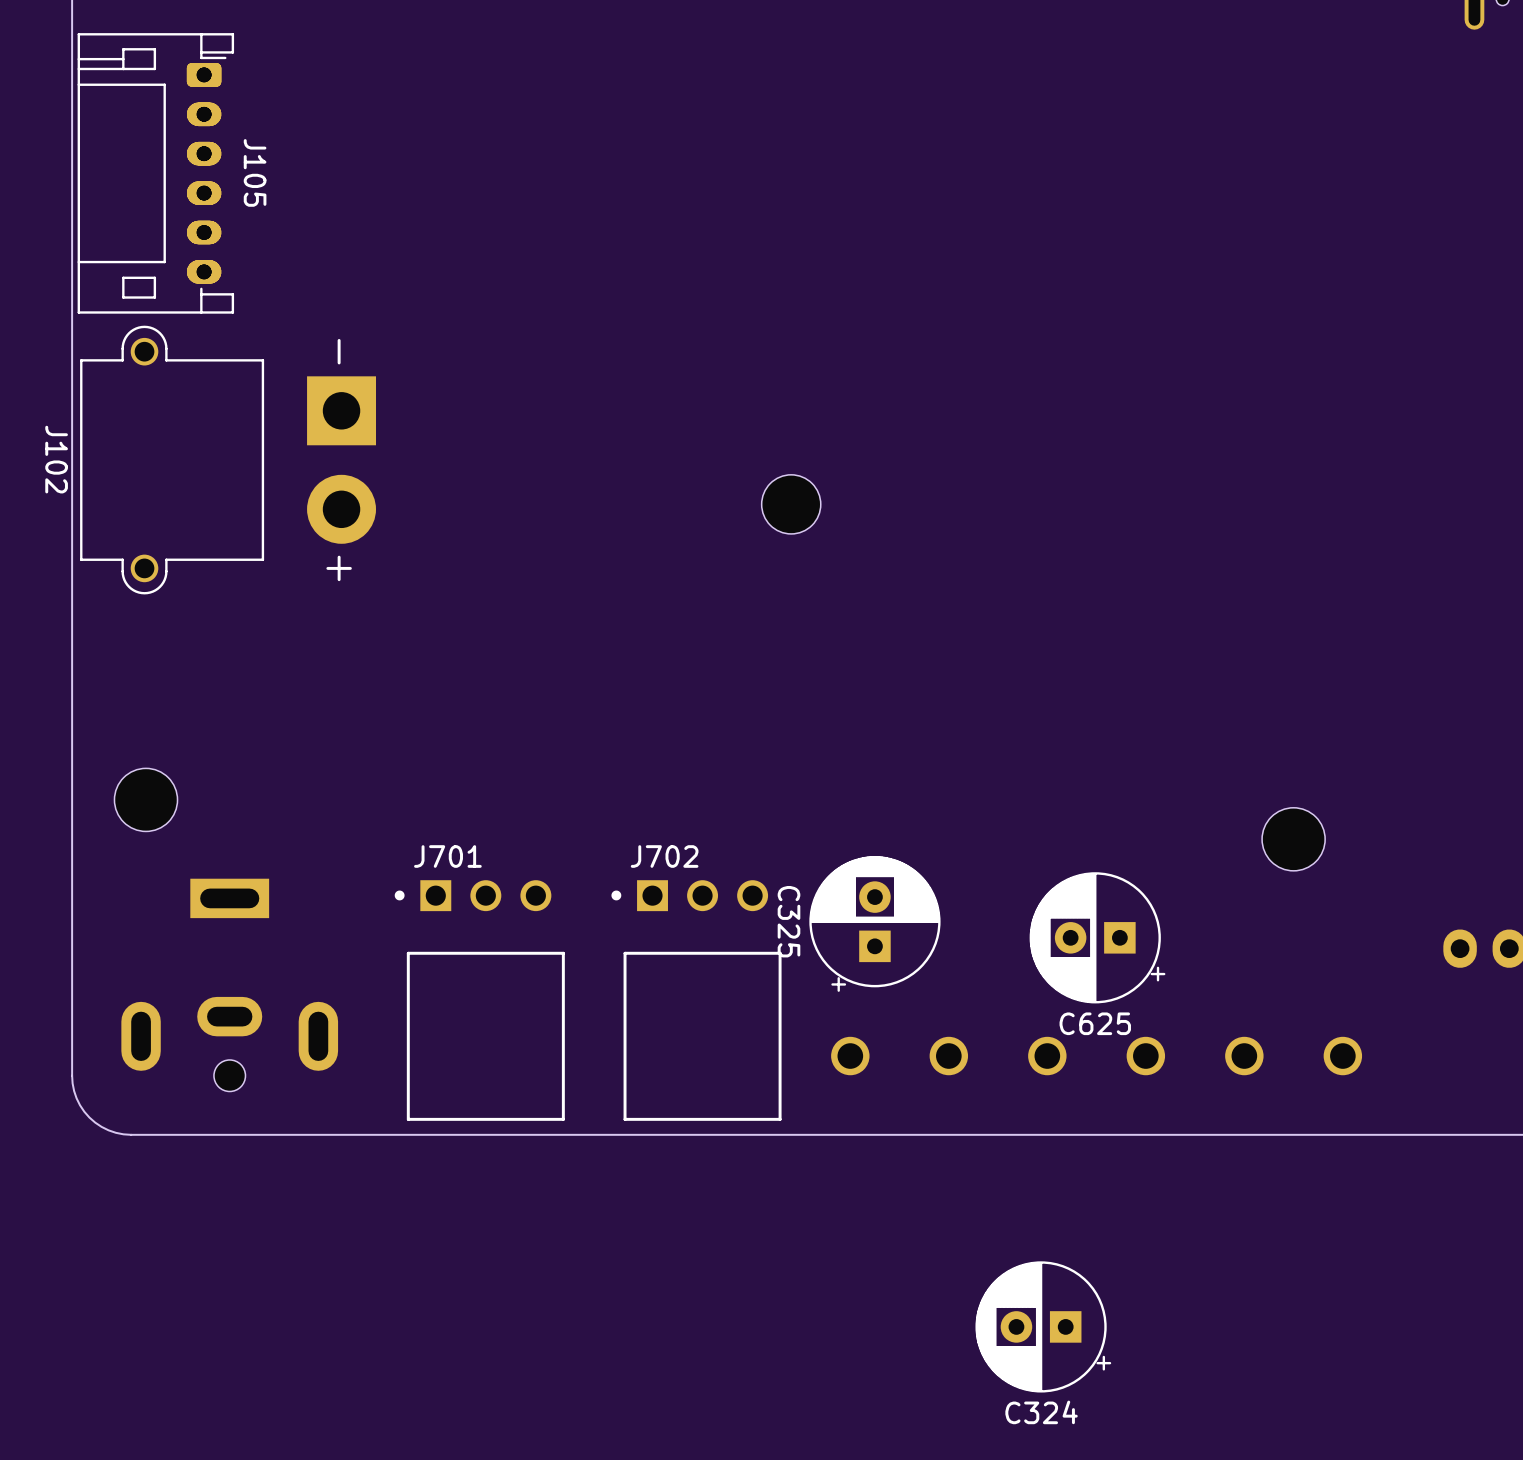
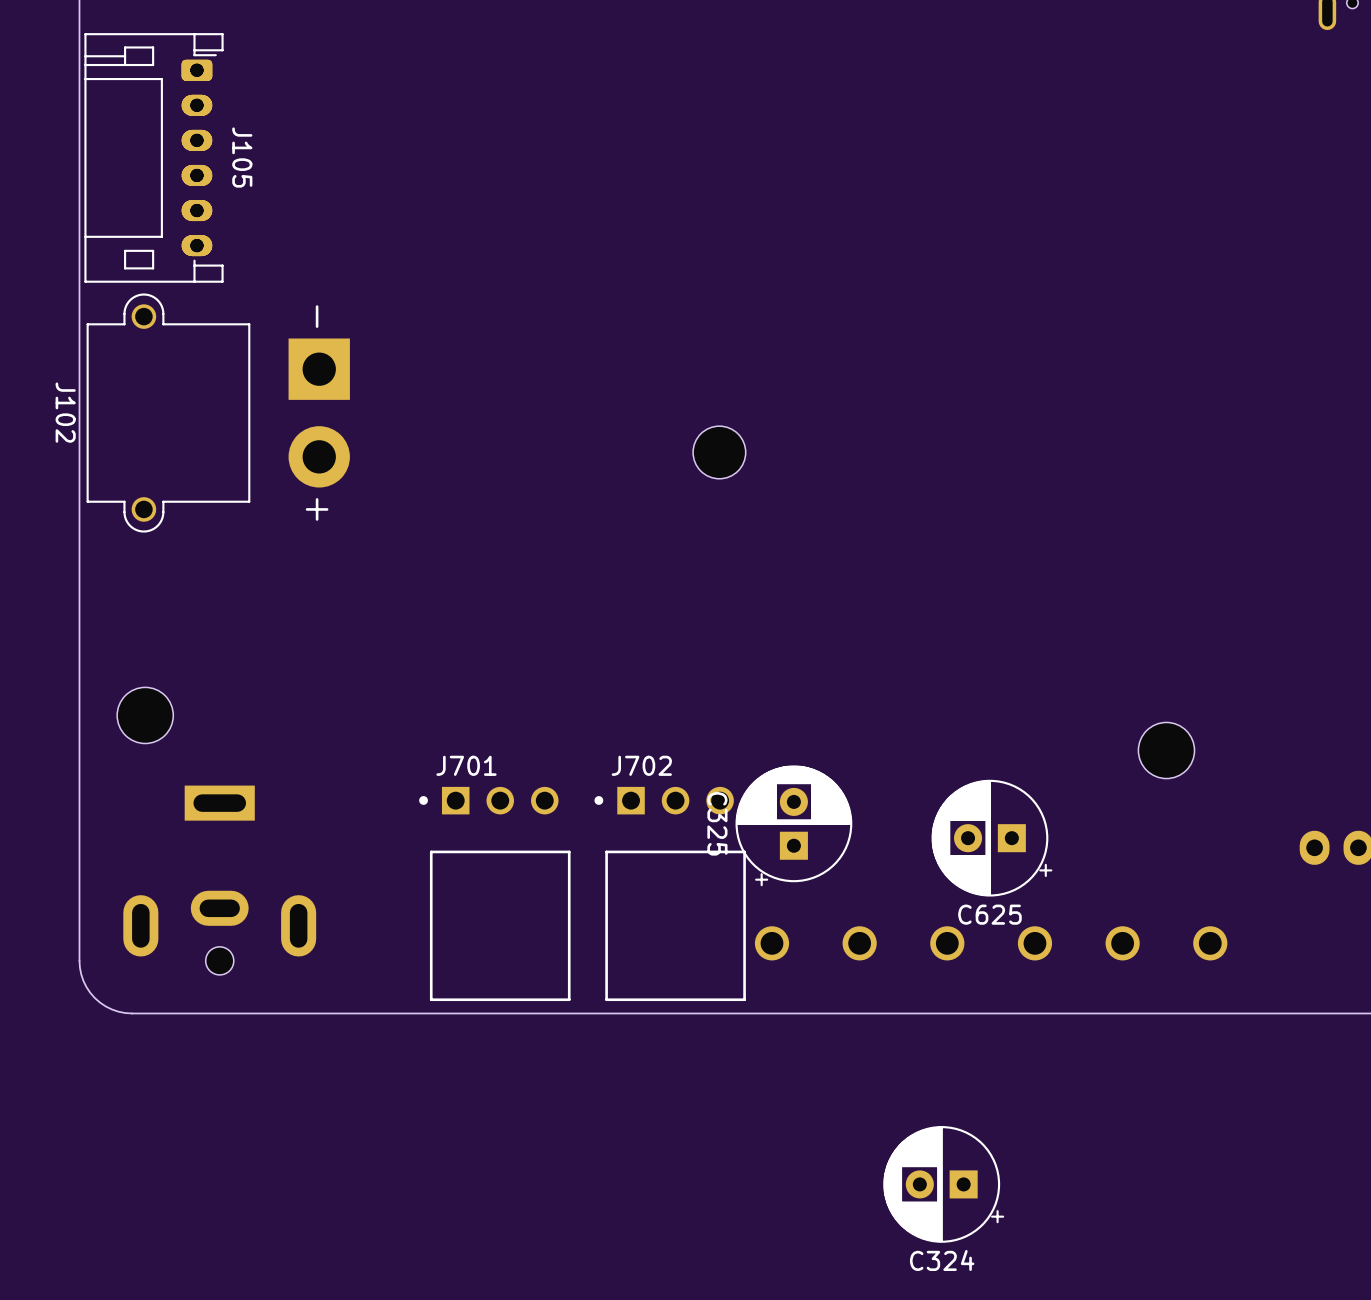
J701 position: (479, 1000) -> (494, 893)
J702 position: (696, 1000) -> (670, 893)

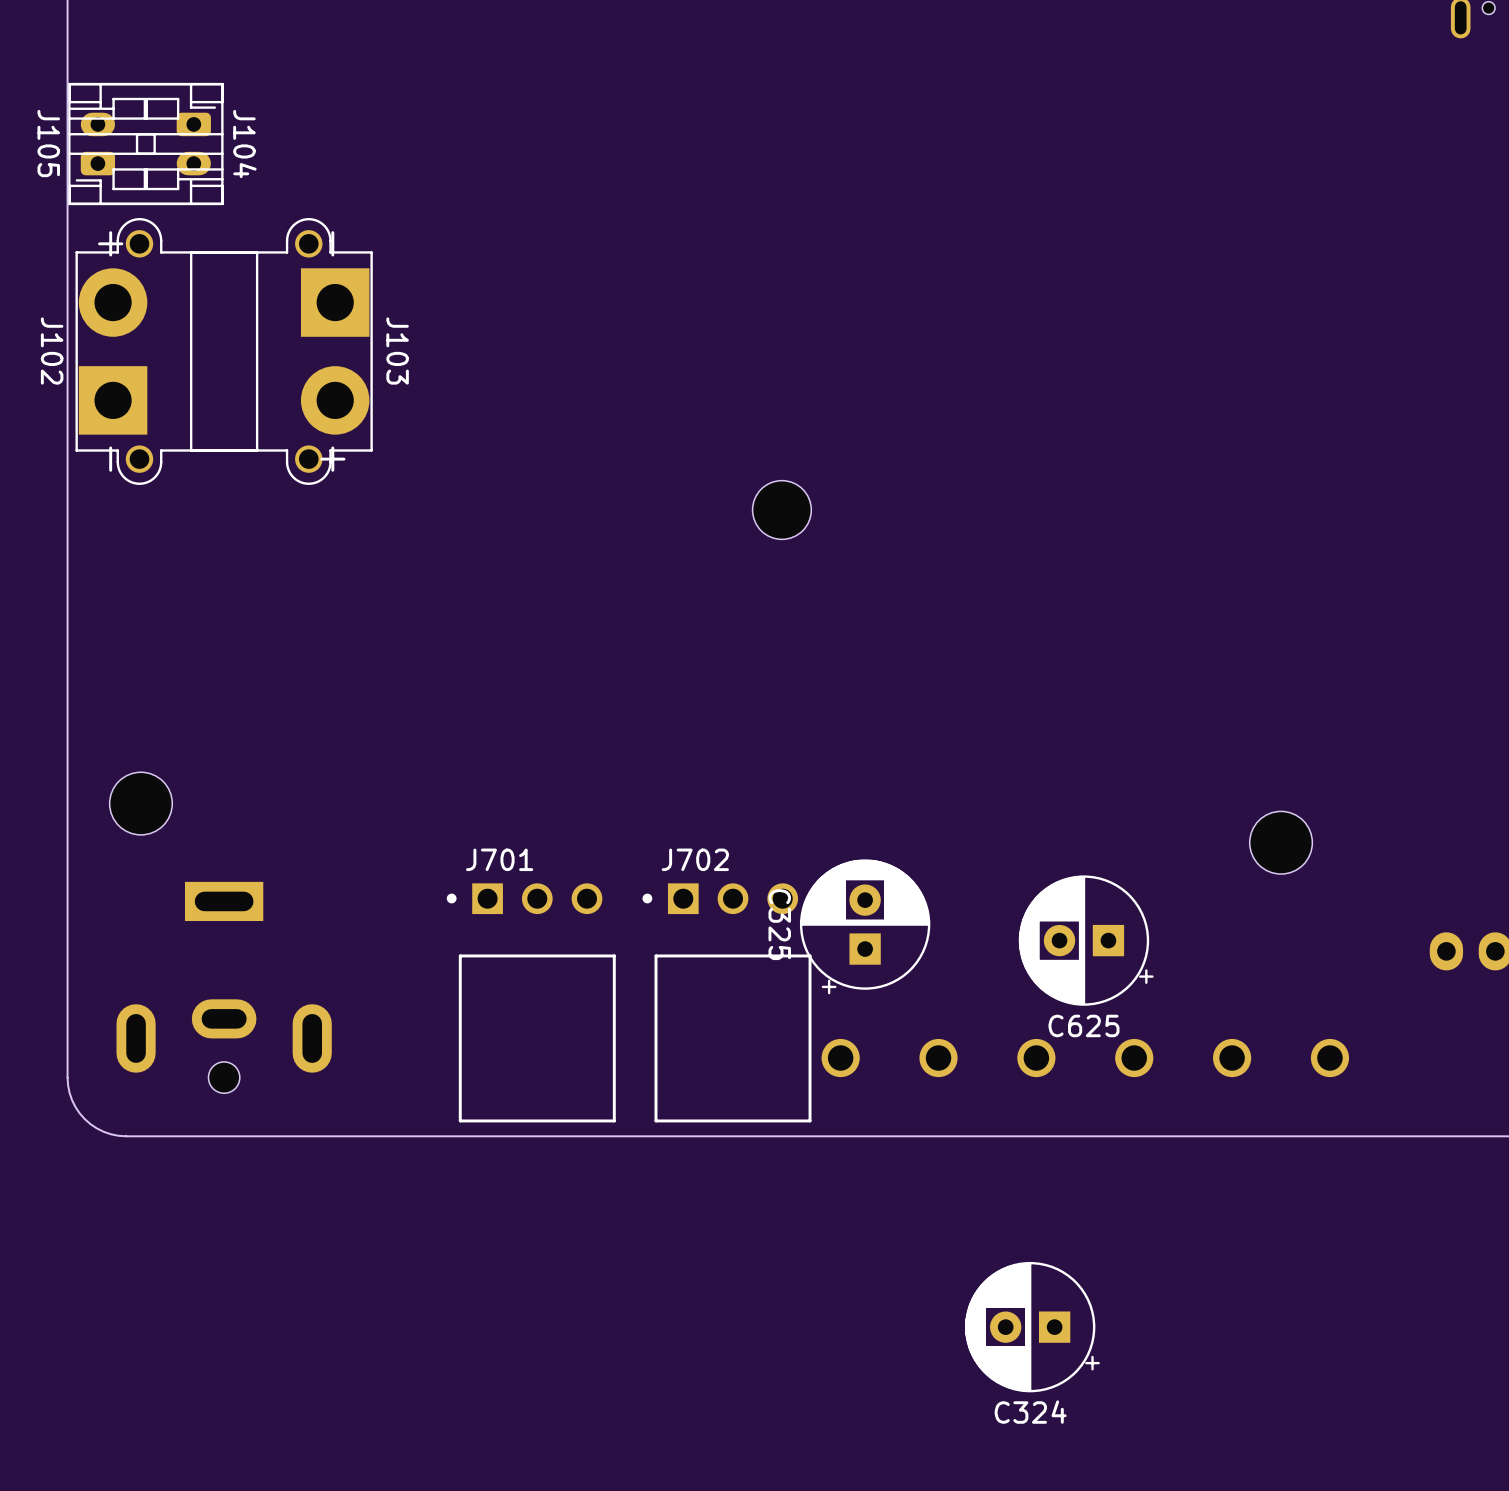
J105 footprint: [84, 33, 224, 283] -> [68, 82, 224, 206]
J104: none -> (145, 144)
part: (196, 157) -> none
J105 name position: J105 (242, 157) -> J105 (48, 143)
J103: none -> (225, 351)
J102 position: (218, 413) -> (222, 351)

